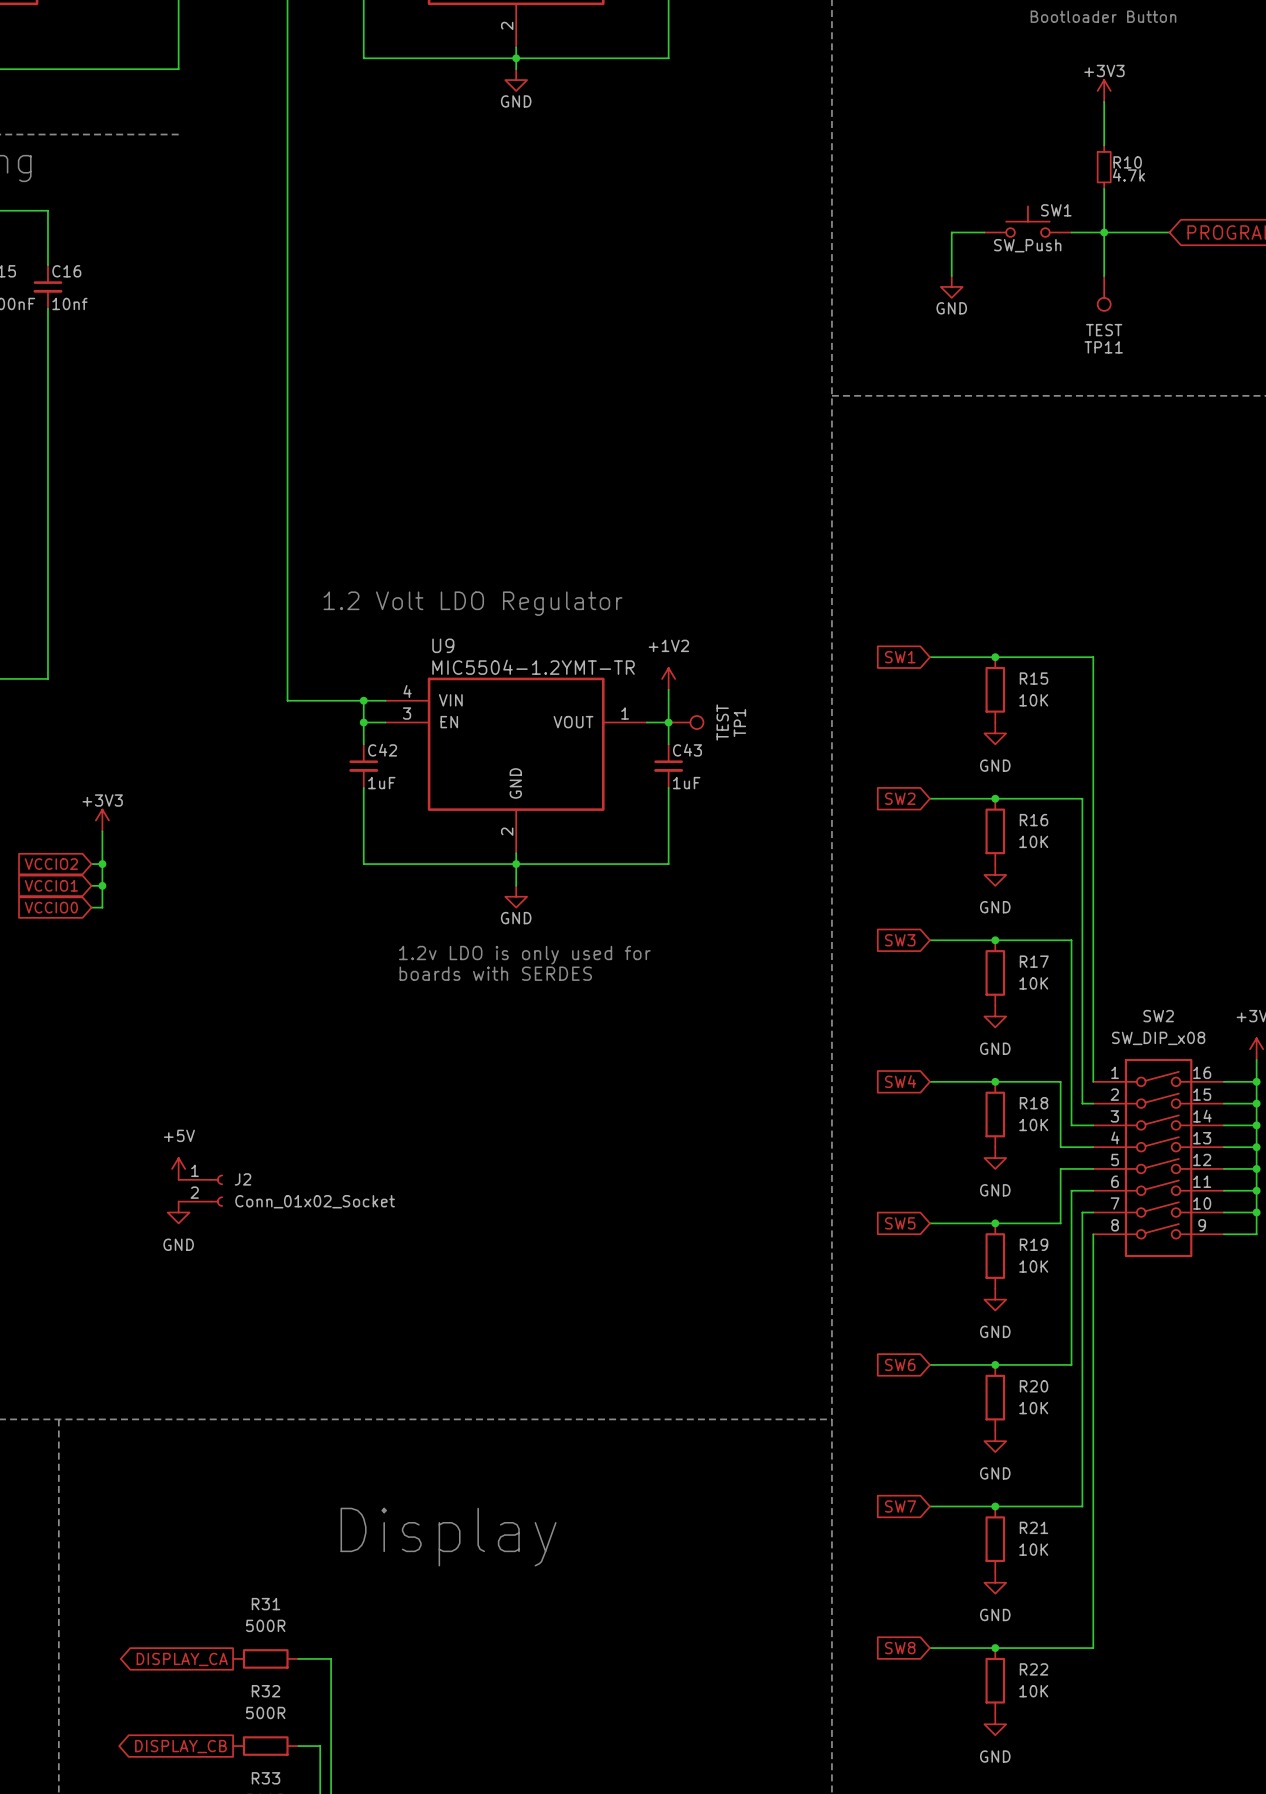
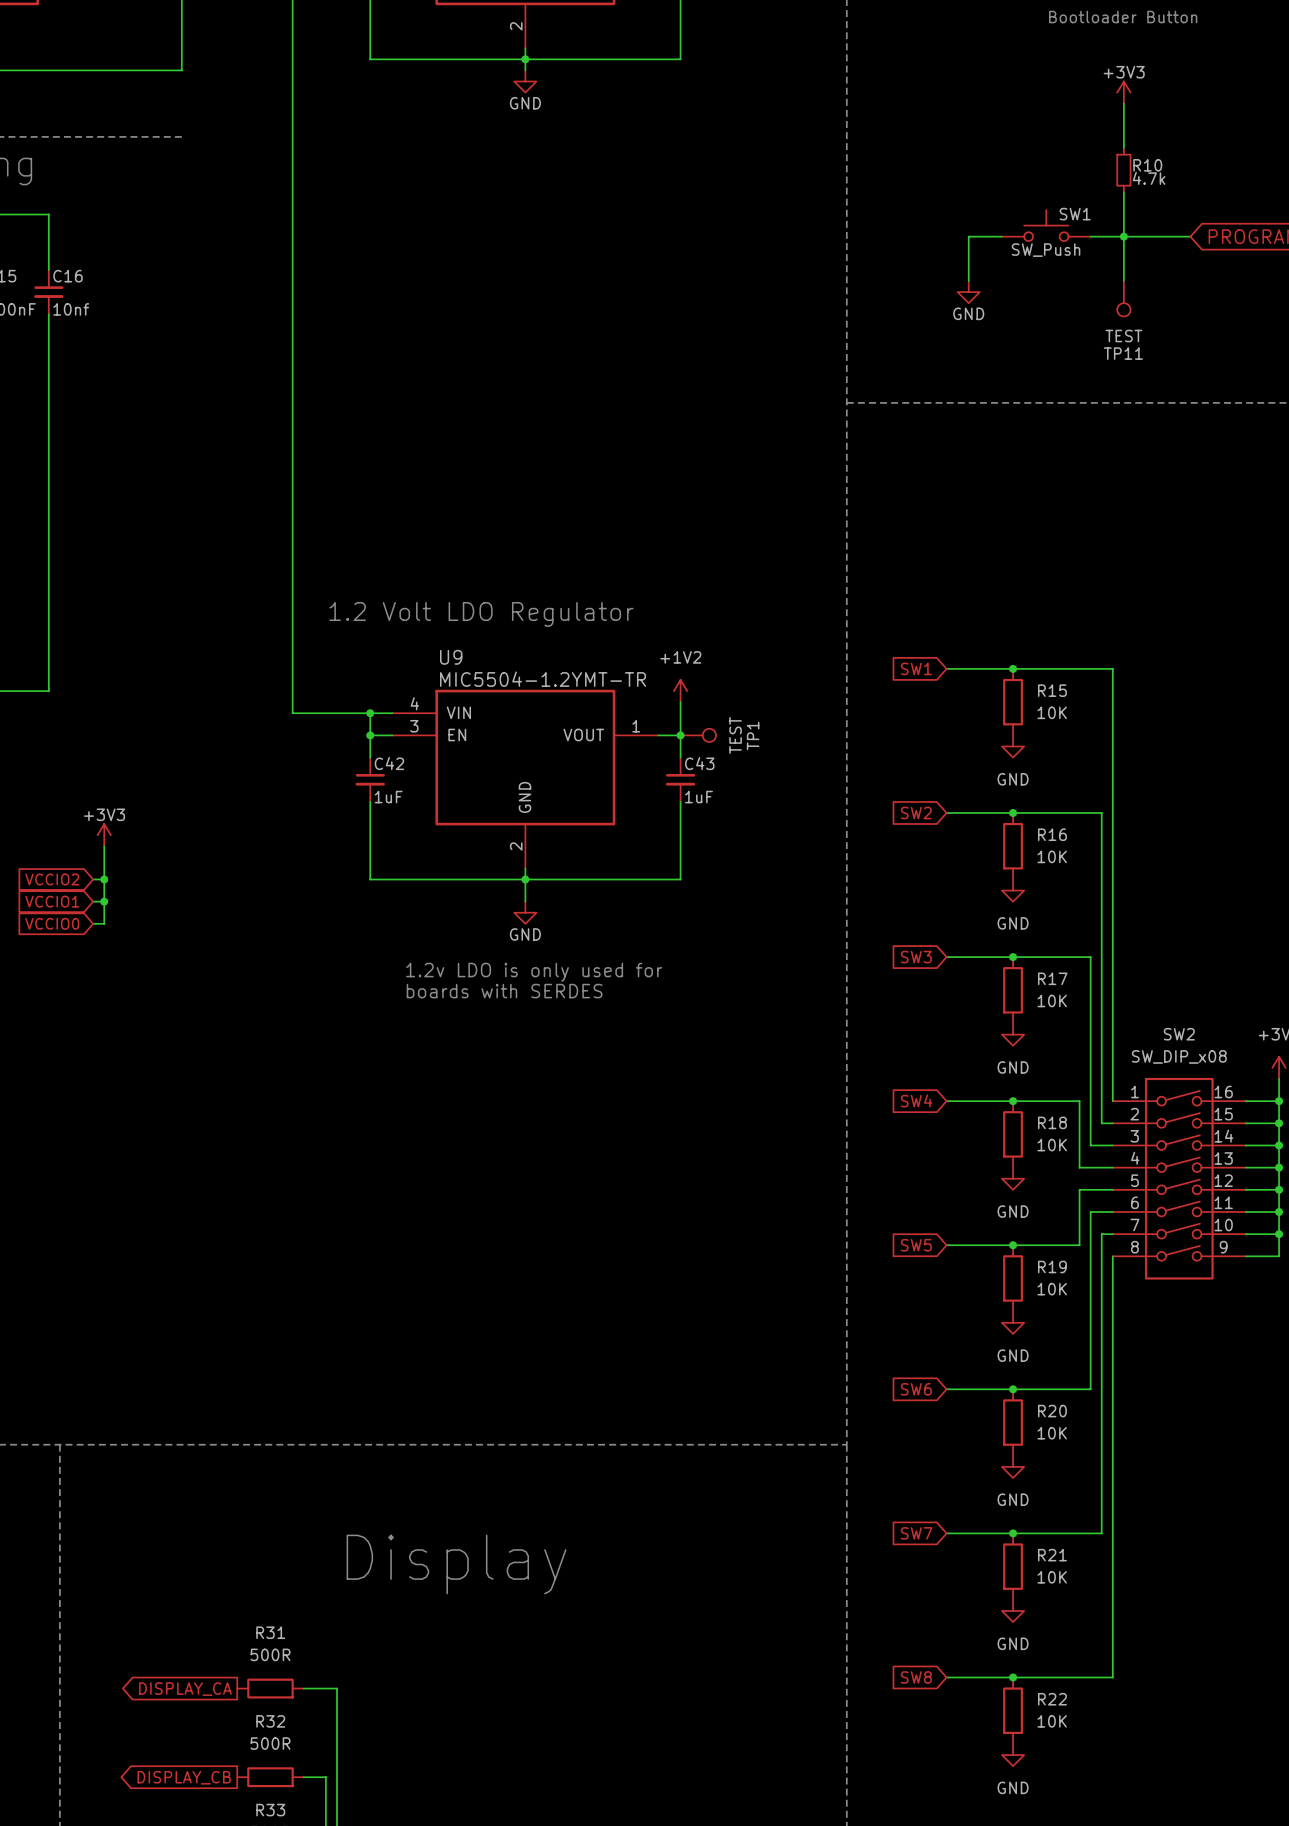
power symbol: +5V (178, 1168) -> none
J2: Conn_01x02_Socket (200, 1190) -> none
power symbol: GND (178, 1212) -> none

